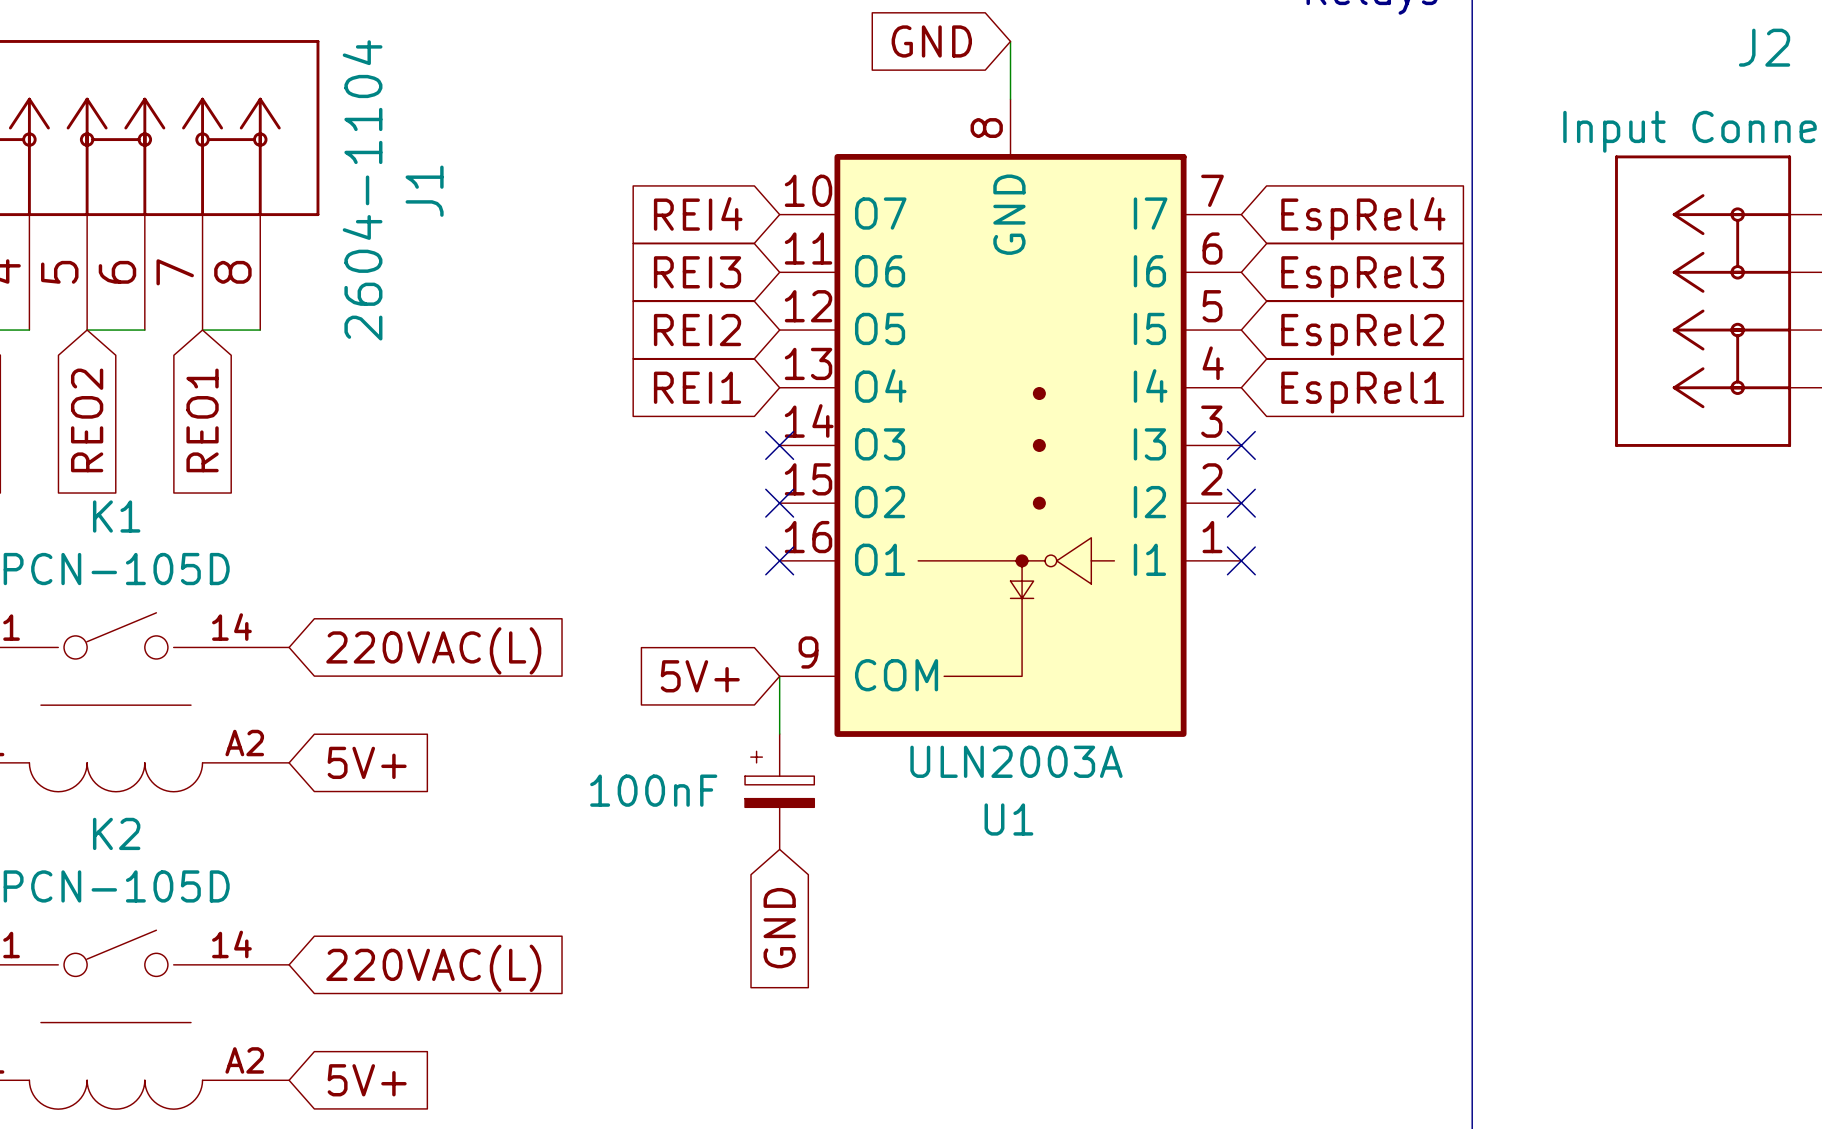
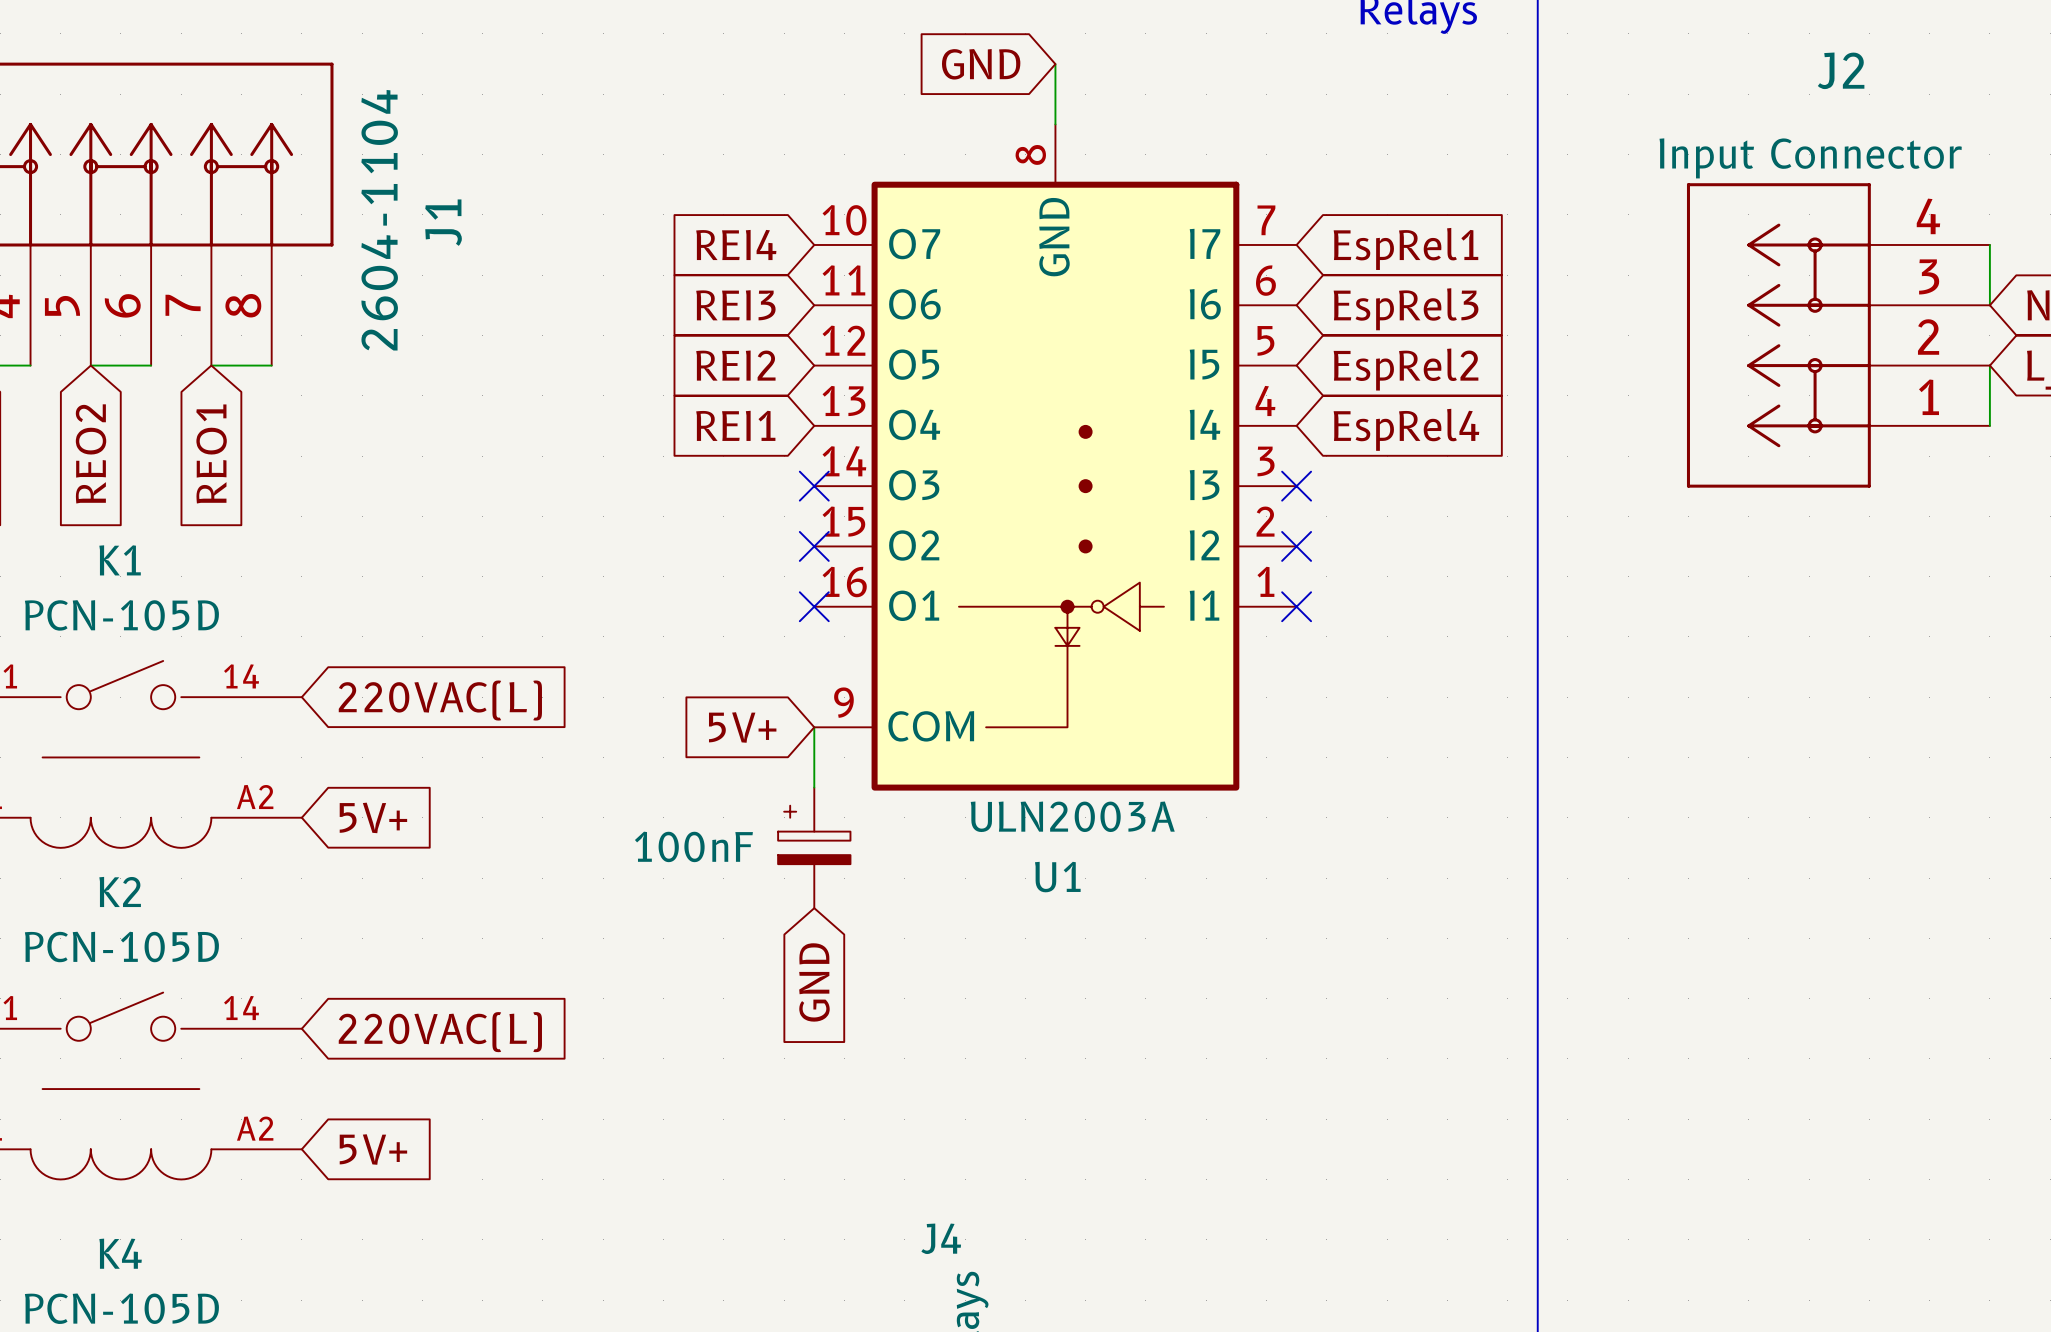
global label: EspRel4 (1363, 218) -> EspRel1 (1405, 248)
global label: EspRel1 (1362, 392) -> EspRel4 (1406, 429)

